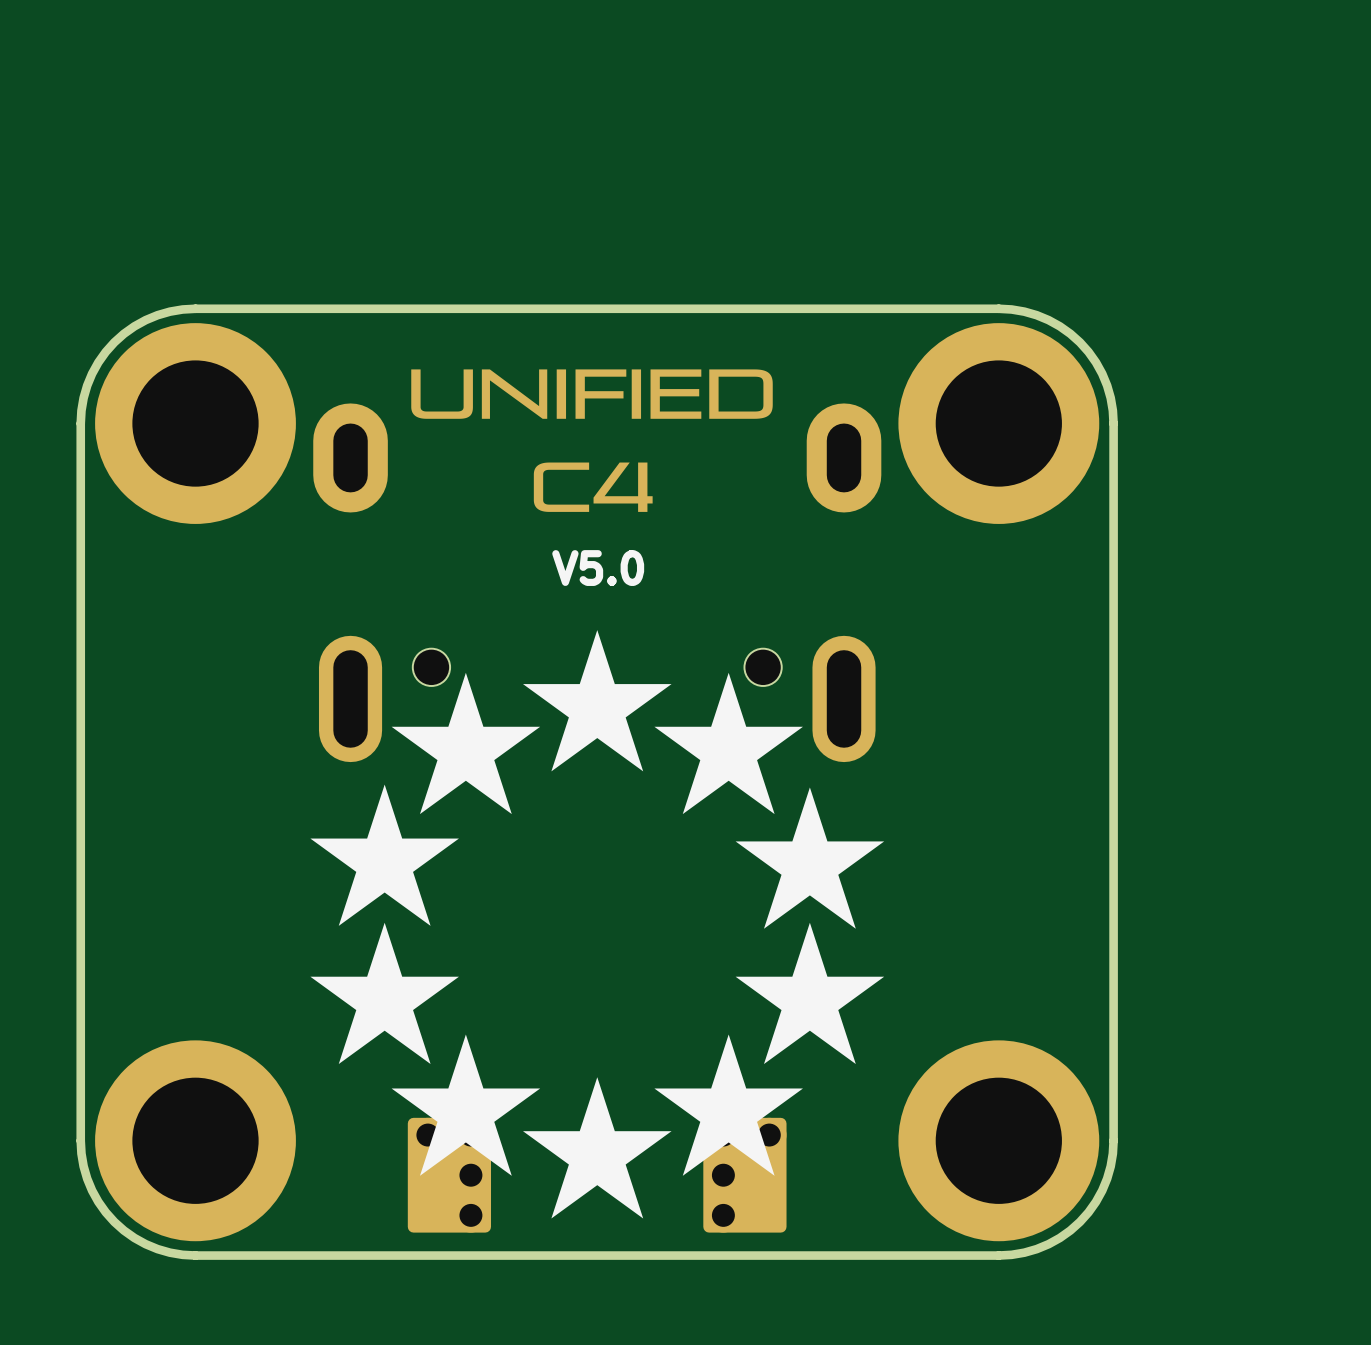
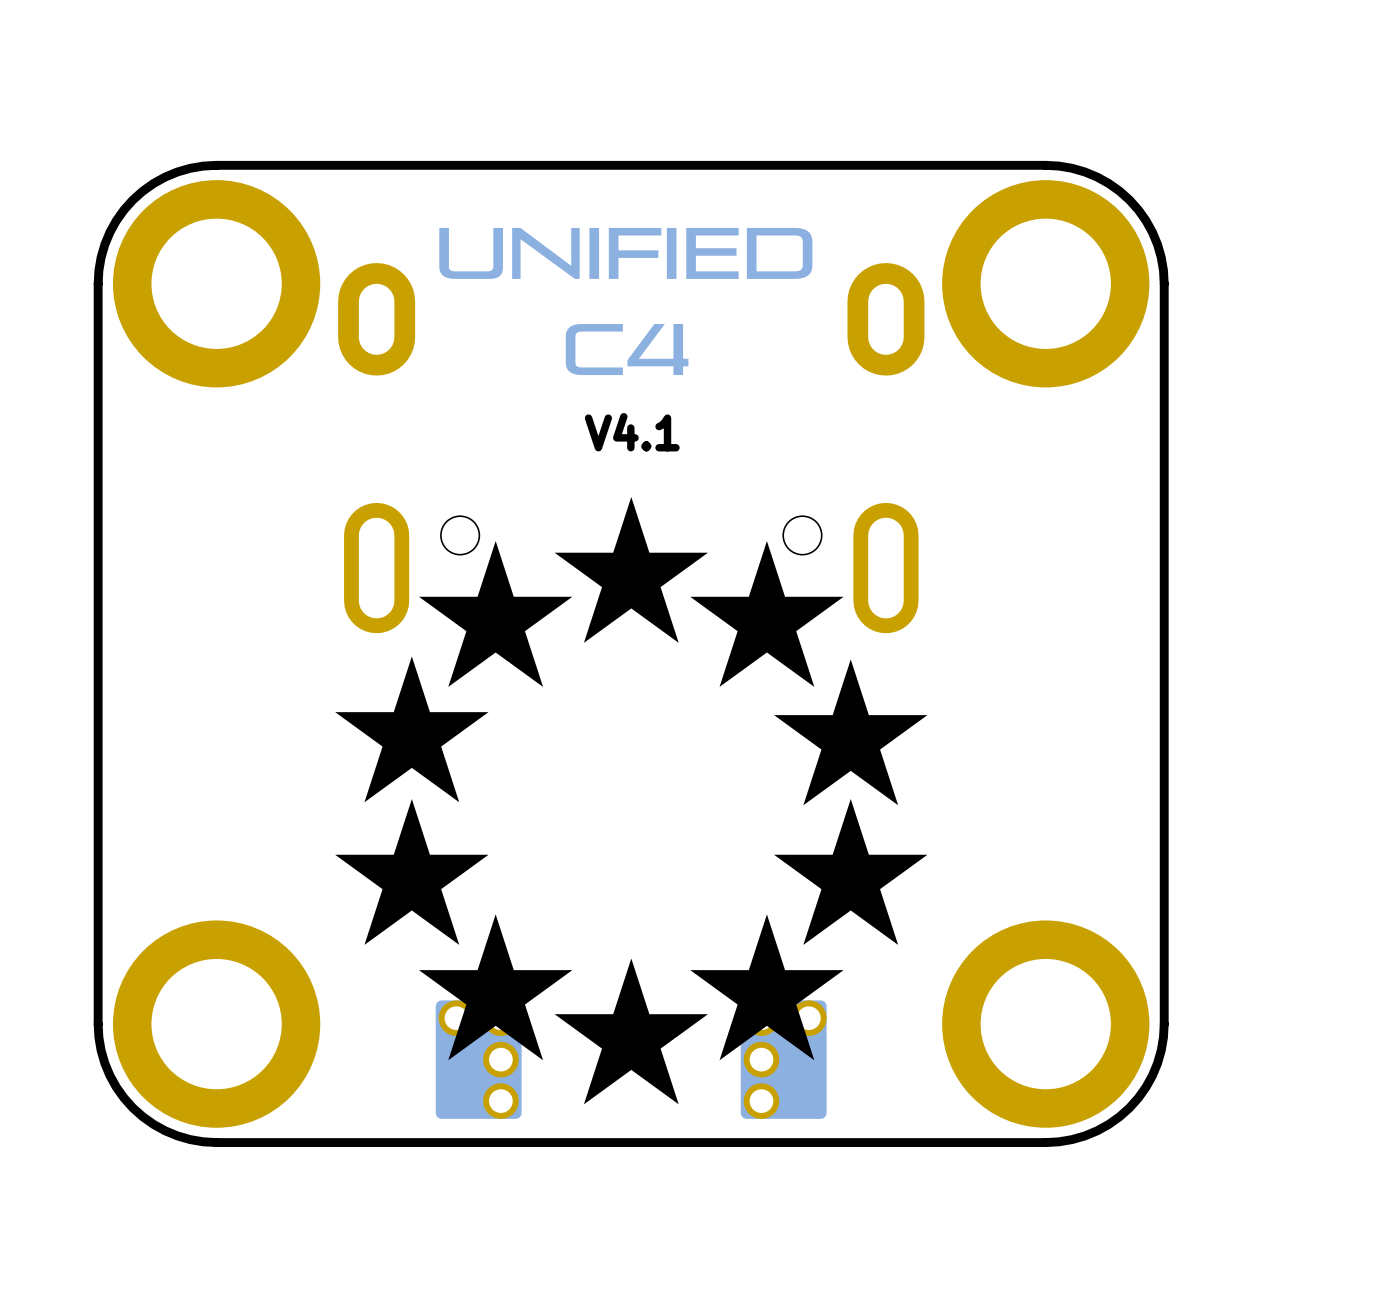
text: V5.0 (598, 568) -> V4.1 (632, 432)

